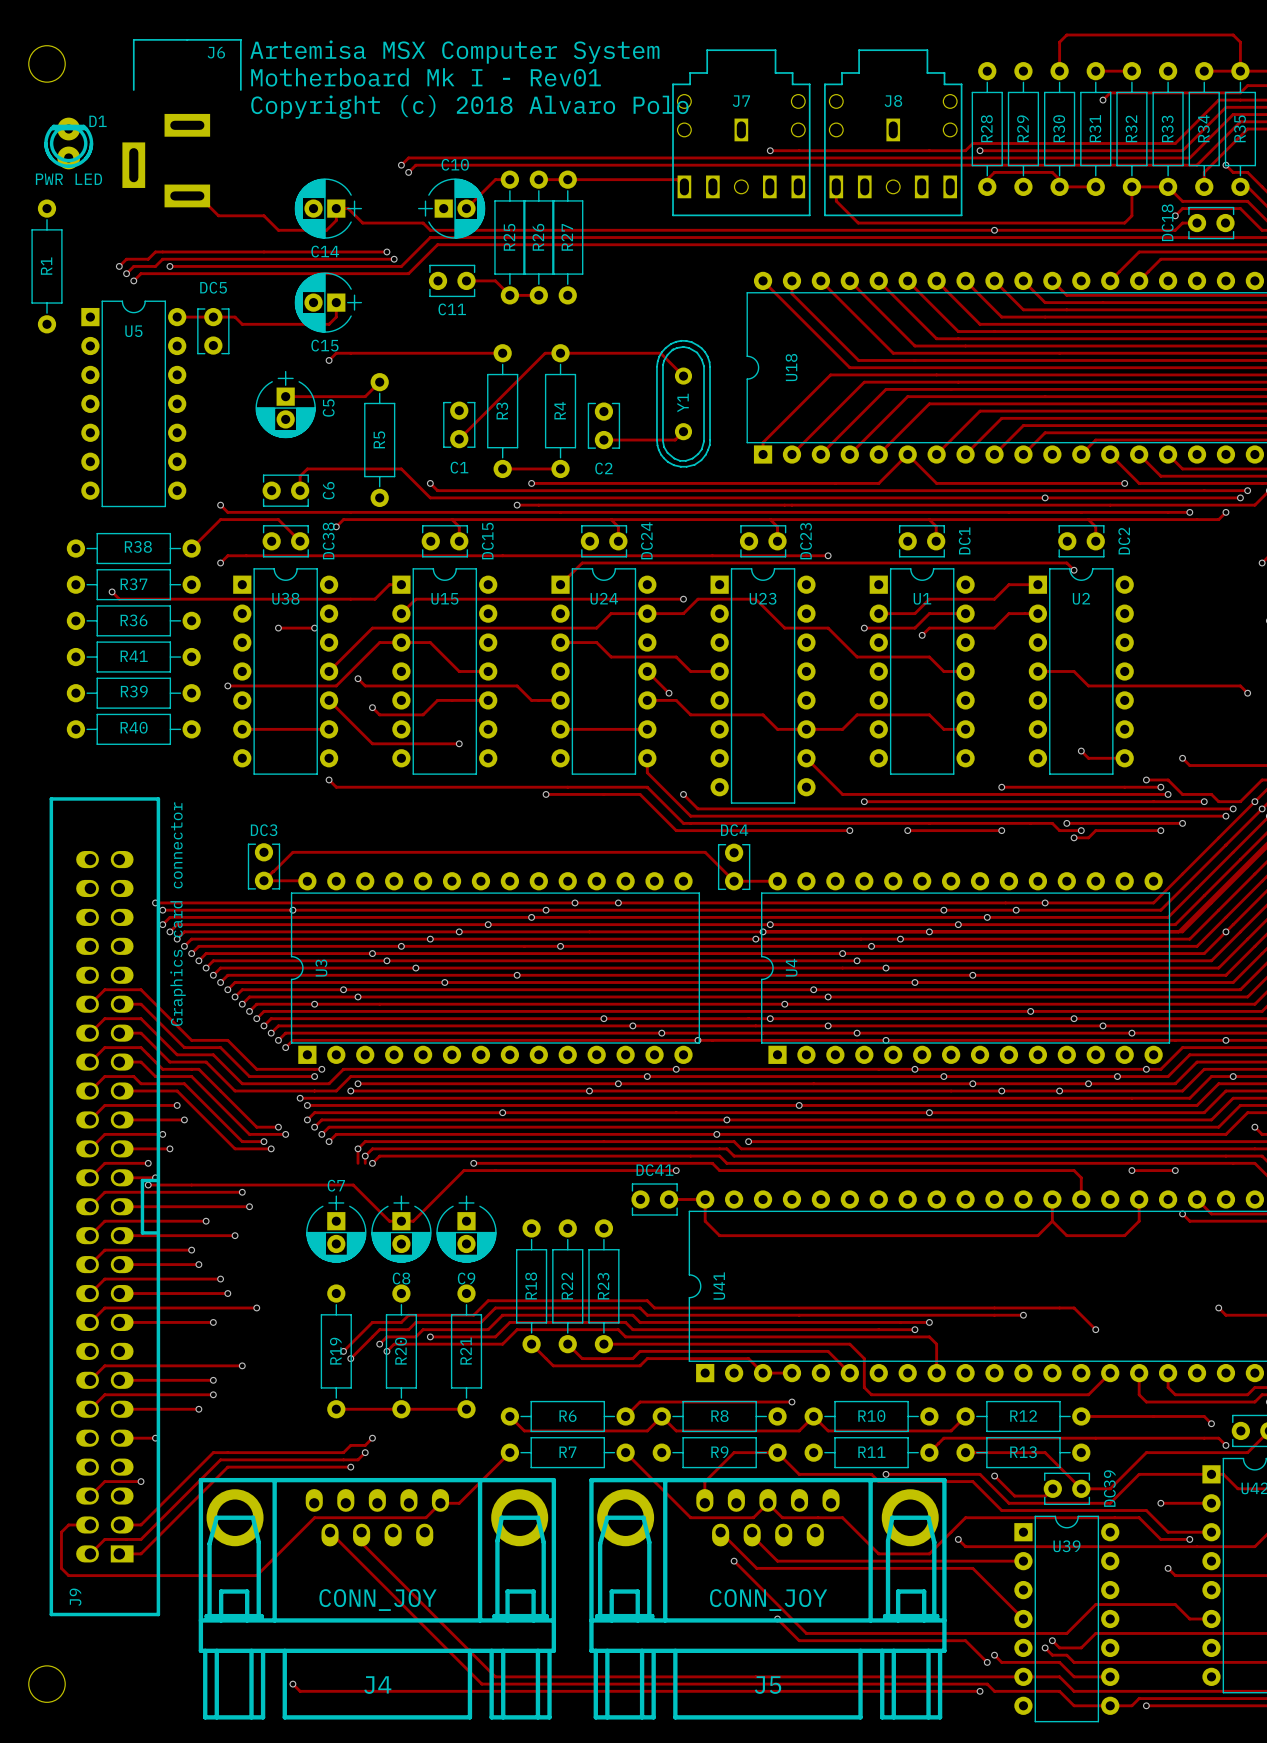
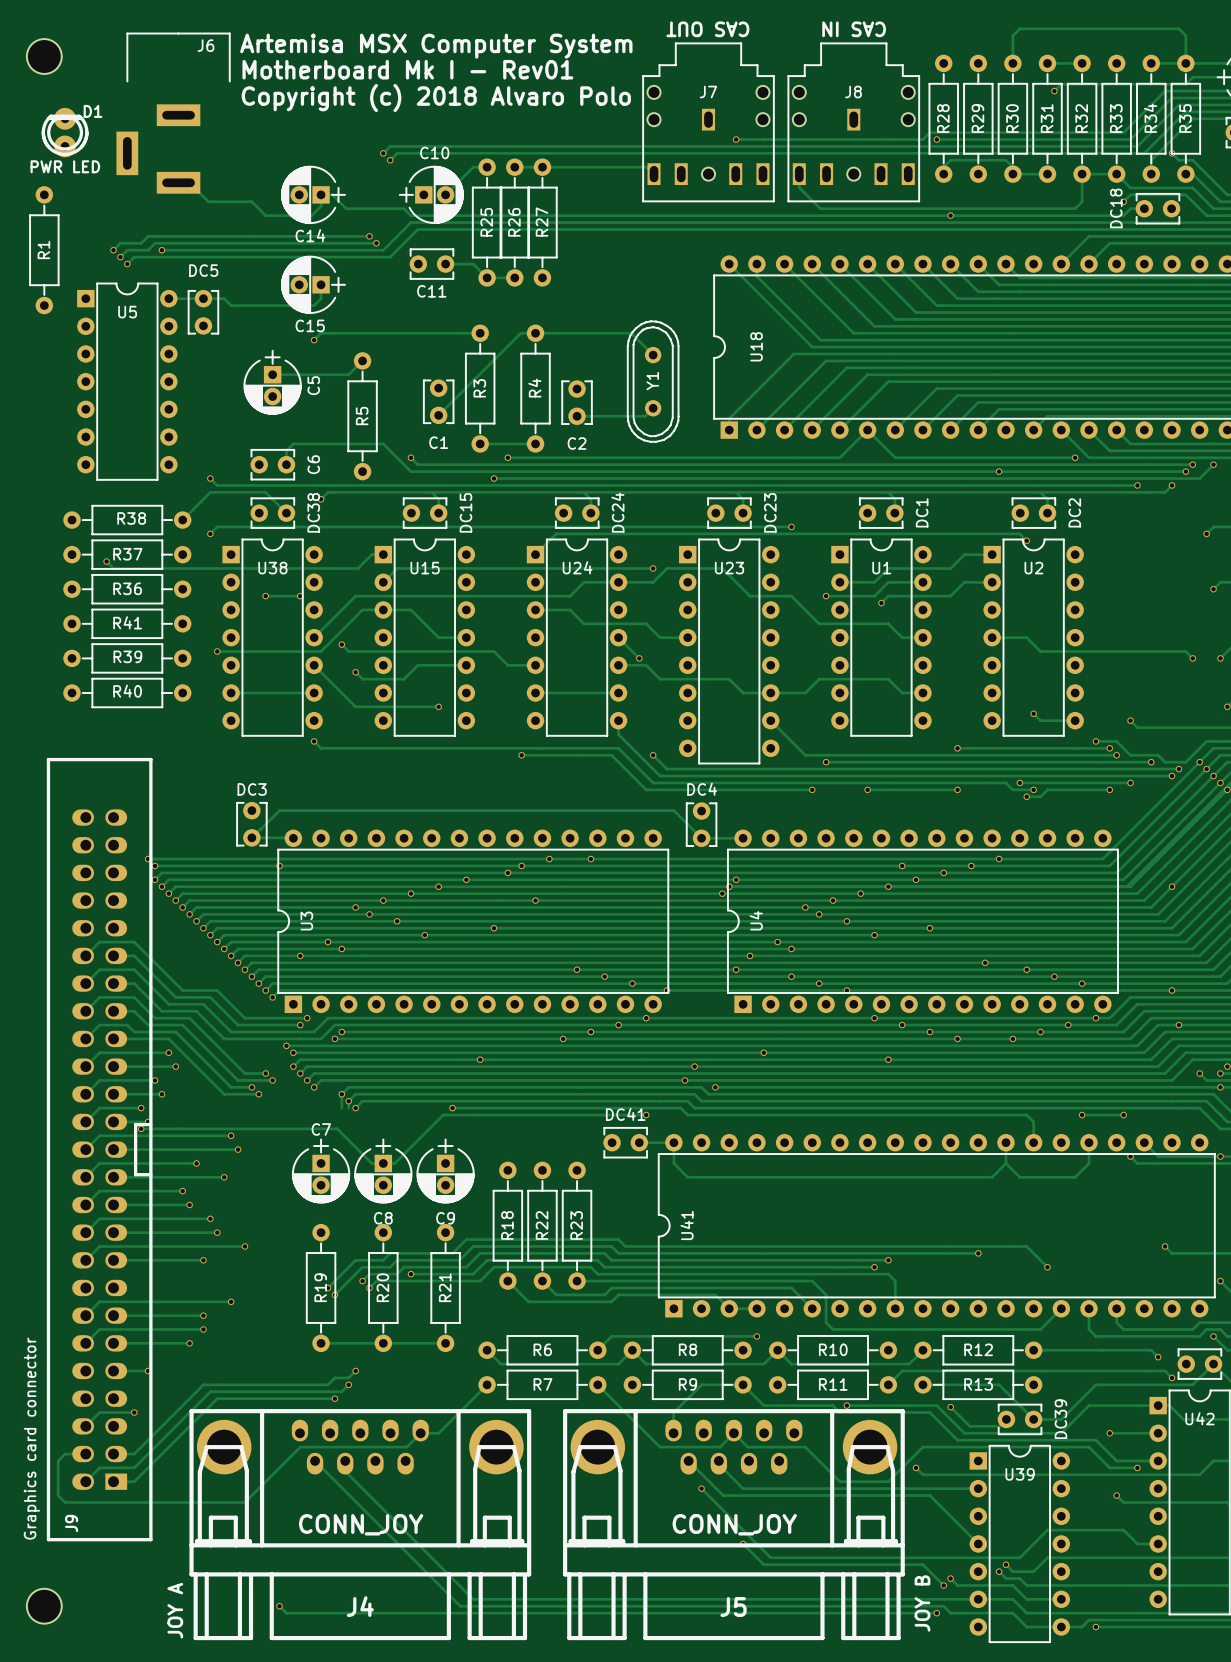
text: none -> CAS OUT (707, 29)
text: none -> CAS IN (854, 29)
text: Graphics card connector (177, 914) -> none
text: none -> Graphics card connector (31, 1438)
text: none -> JOY B (922, 1603)
text: none -> JOY A (175, 1610)

